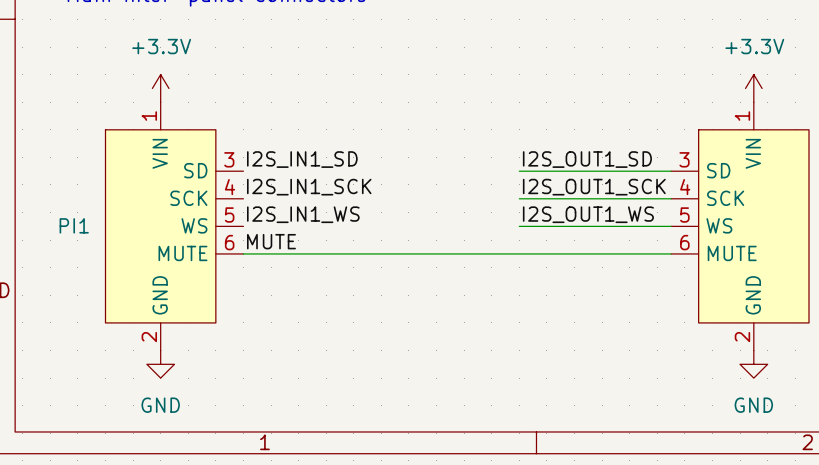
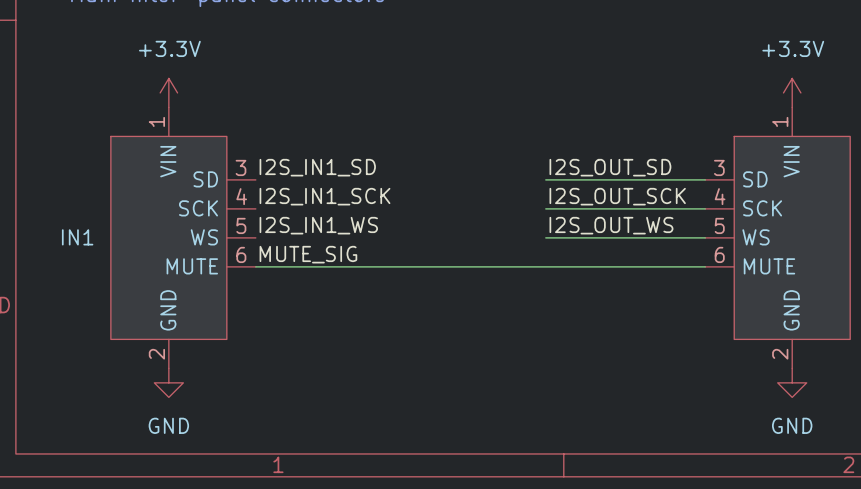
label: I2S_OUT1_SD (587, 159) -> I2S_OUT_SD (610, 167)
label: I2S_OUT1_SCK (594, 187) -> I2S_OUT_SCK (617, 196)
label: I2S_OUT1_WS (588, 214) -> I2S_OUT_WS (611, 225)
PI1 name: PI1 (74, 225) -> IN1 (77, 237)
label: MUTE (271, 241) -> MUTE_SIG (308, 254)

